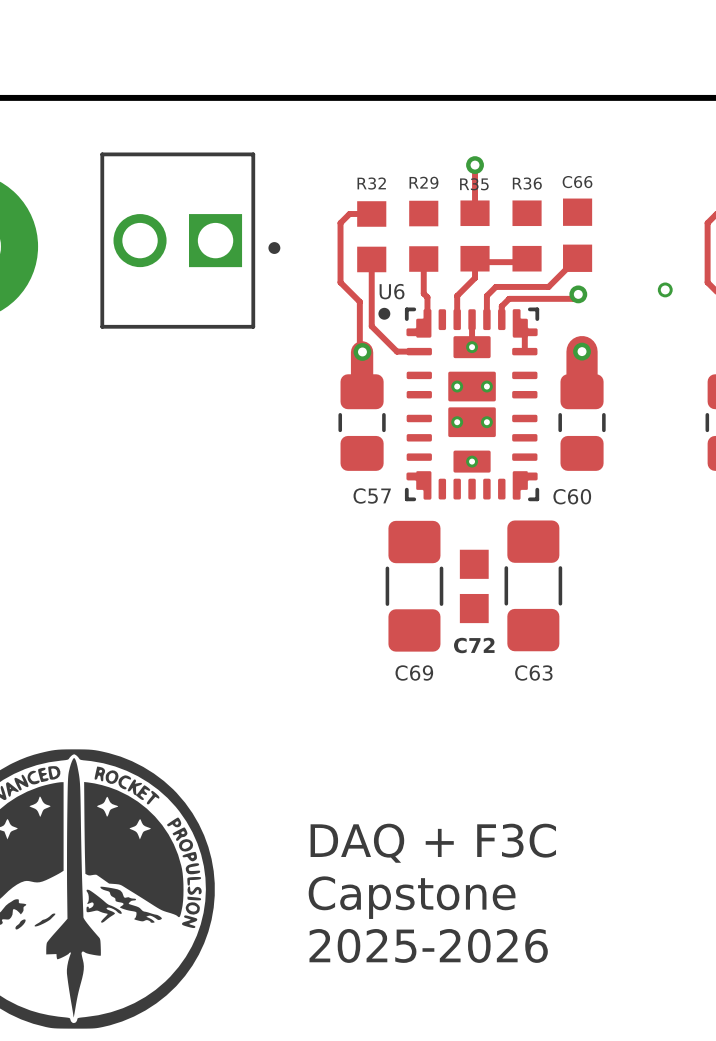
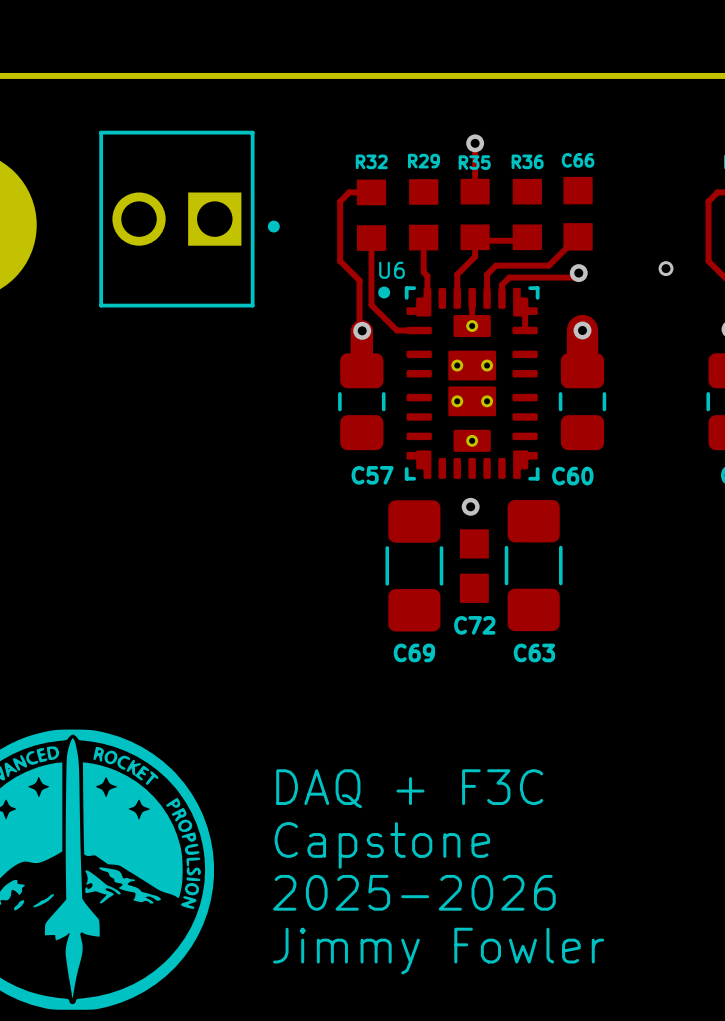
via: none -> (470, 506)
text position: DAQ + F3C (433, 843) -> DAQ + F3C (409, 788)
text position: Capstone (412, 897) -> Capstone (382, 845)
text position: 2025-2026 (428, 945) -> 2025-2026 (414, 892)
text: none -> Jimmy Fowler (438, 951)

